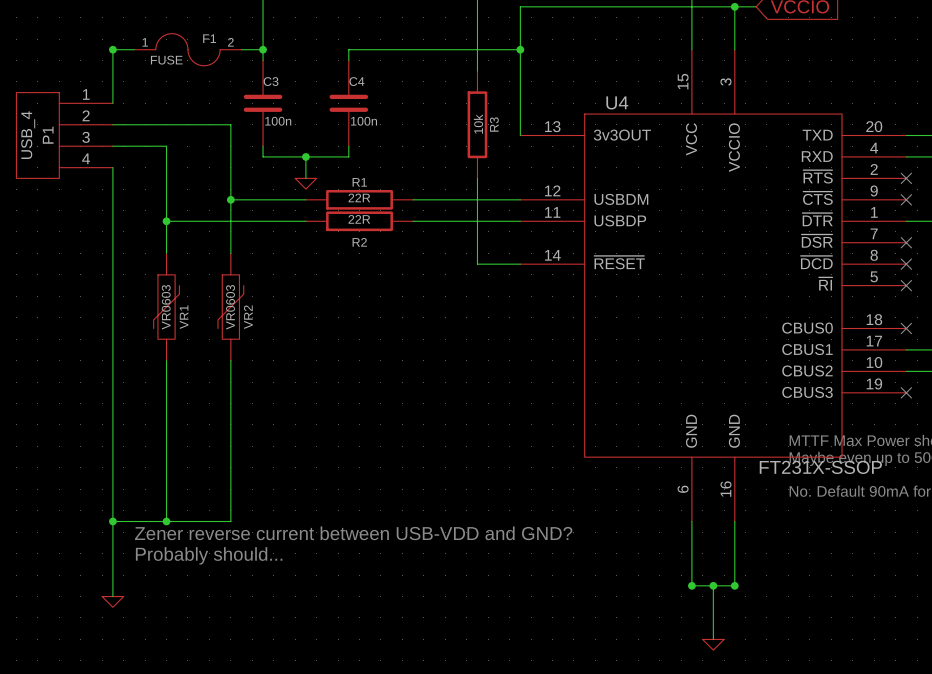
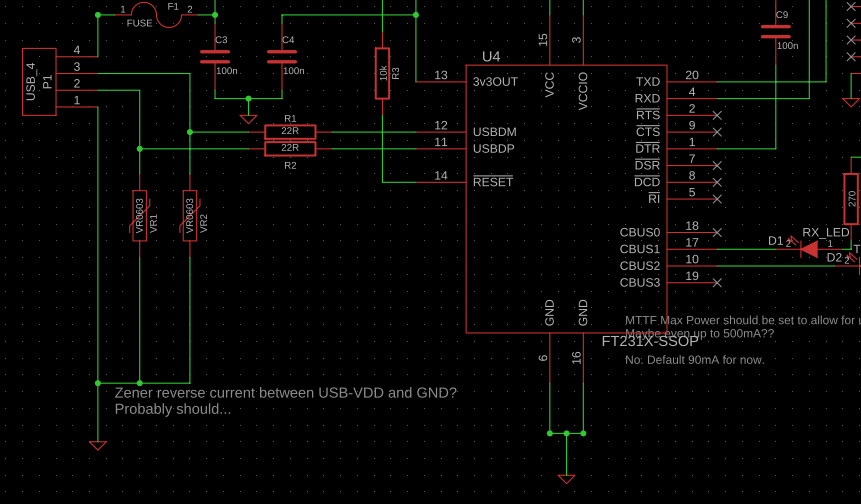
P1 flip: as is (37, 135) -> up-down (39, 81)

